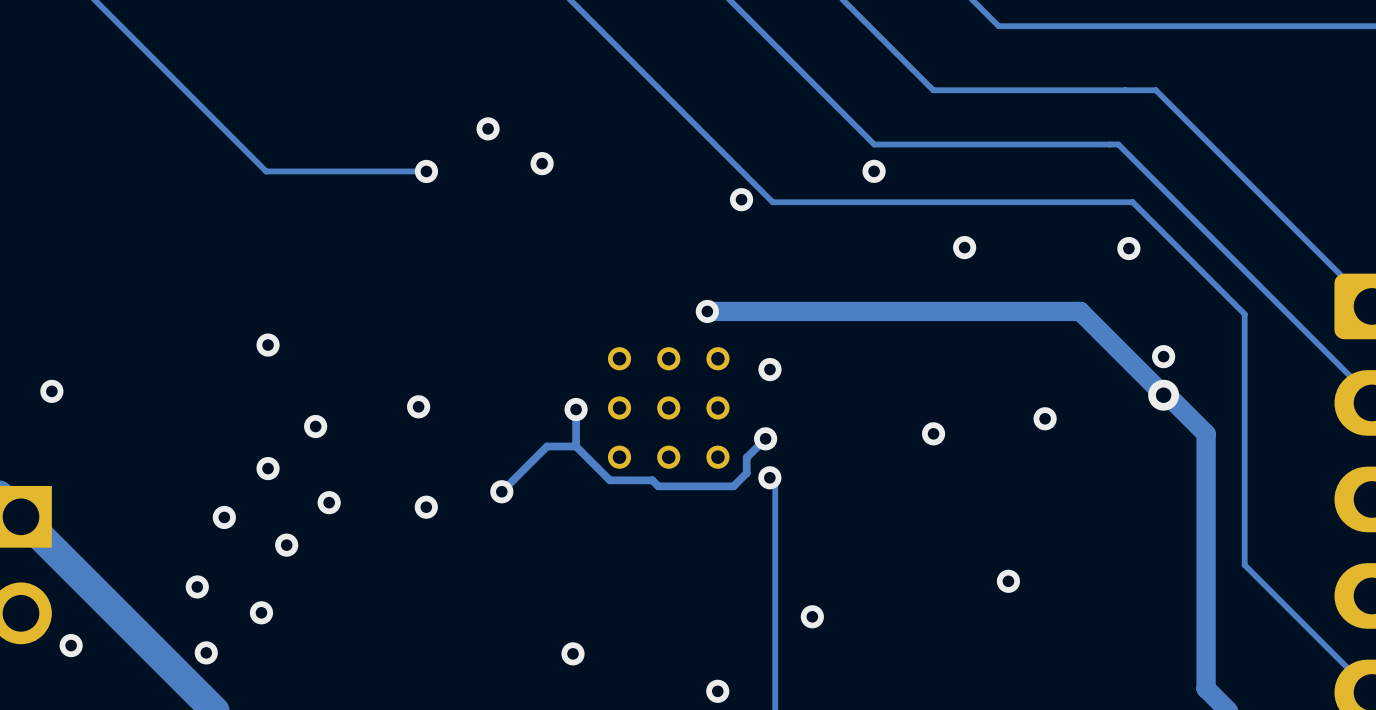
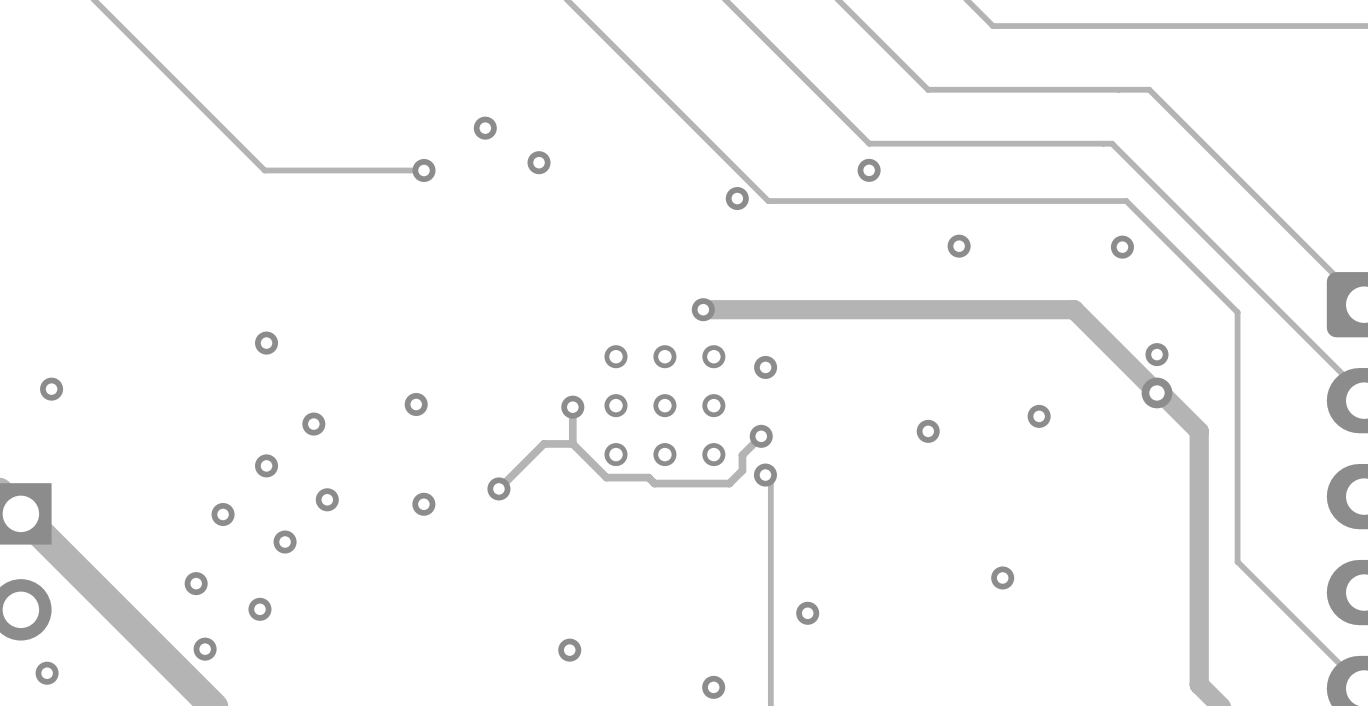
via: (71, 645) -> none
via: none -> (47, 673)

